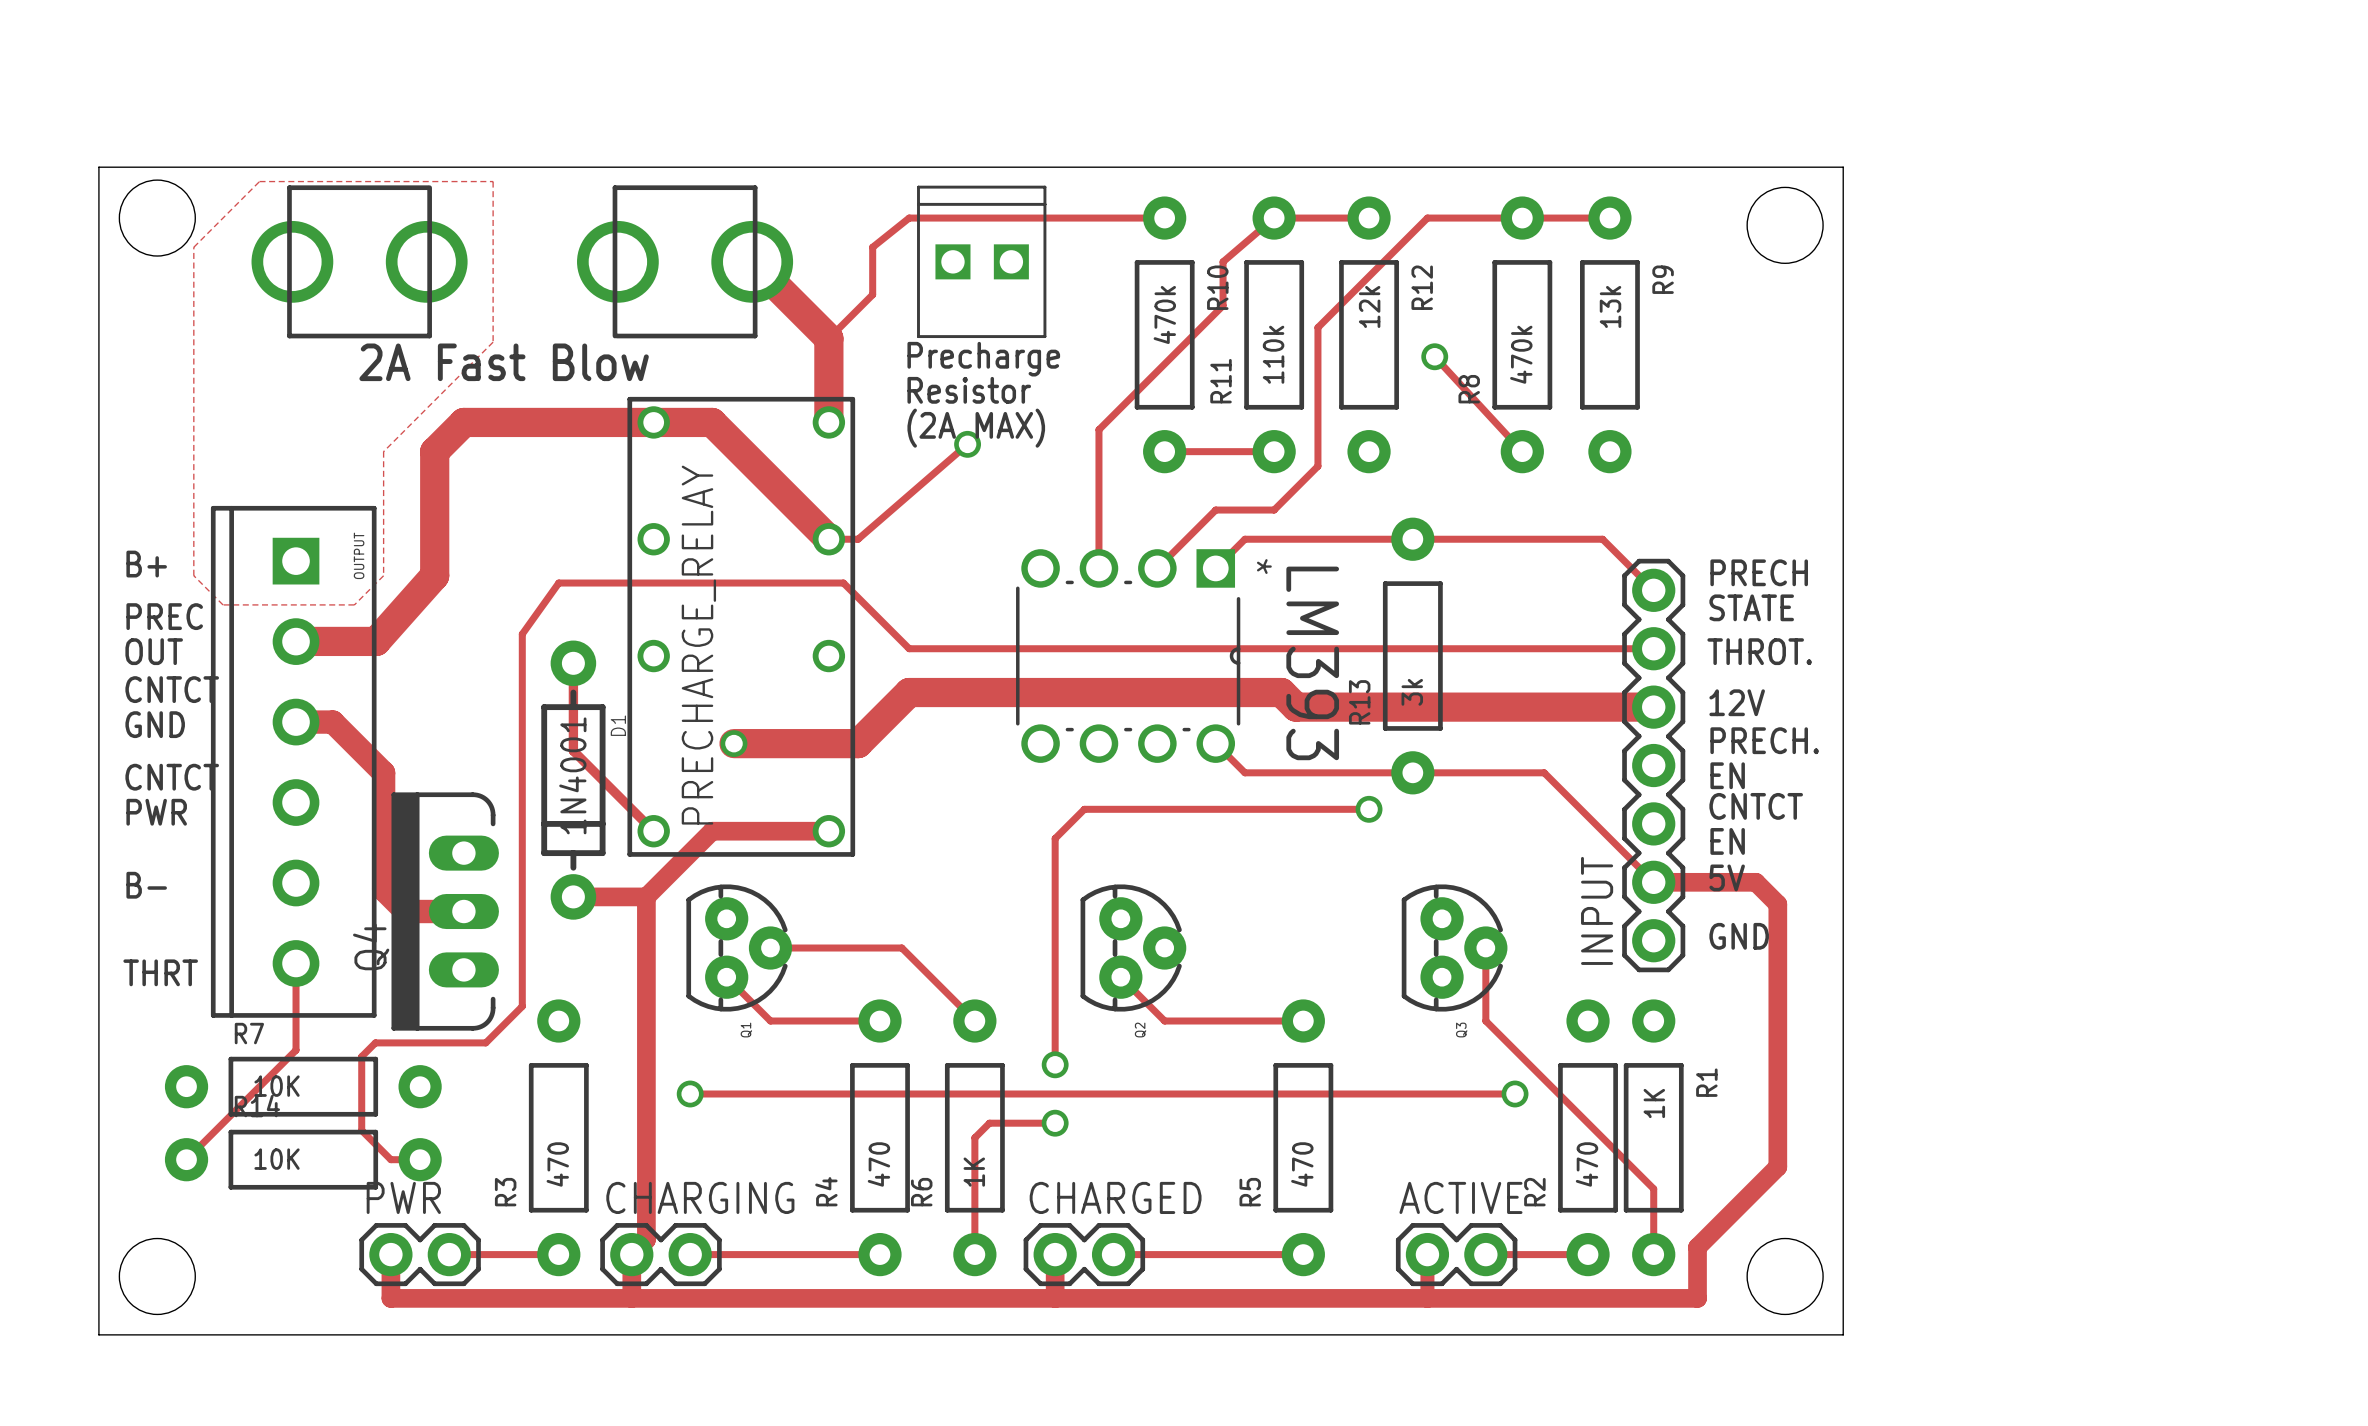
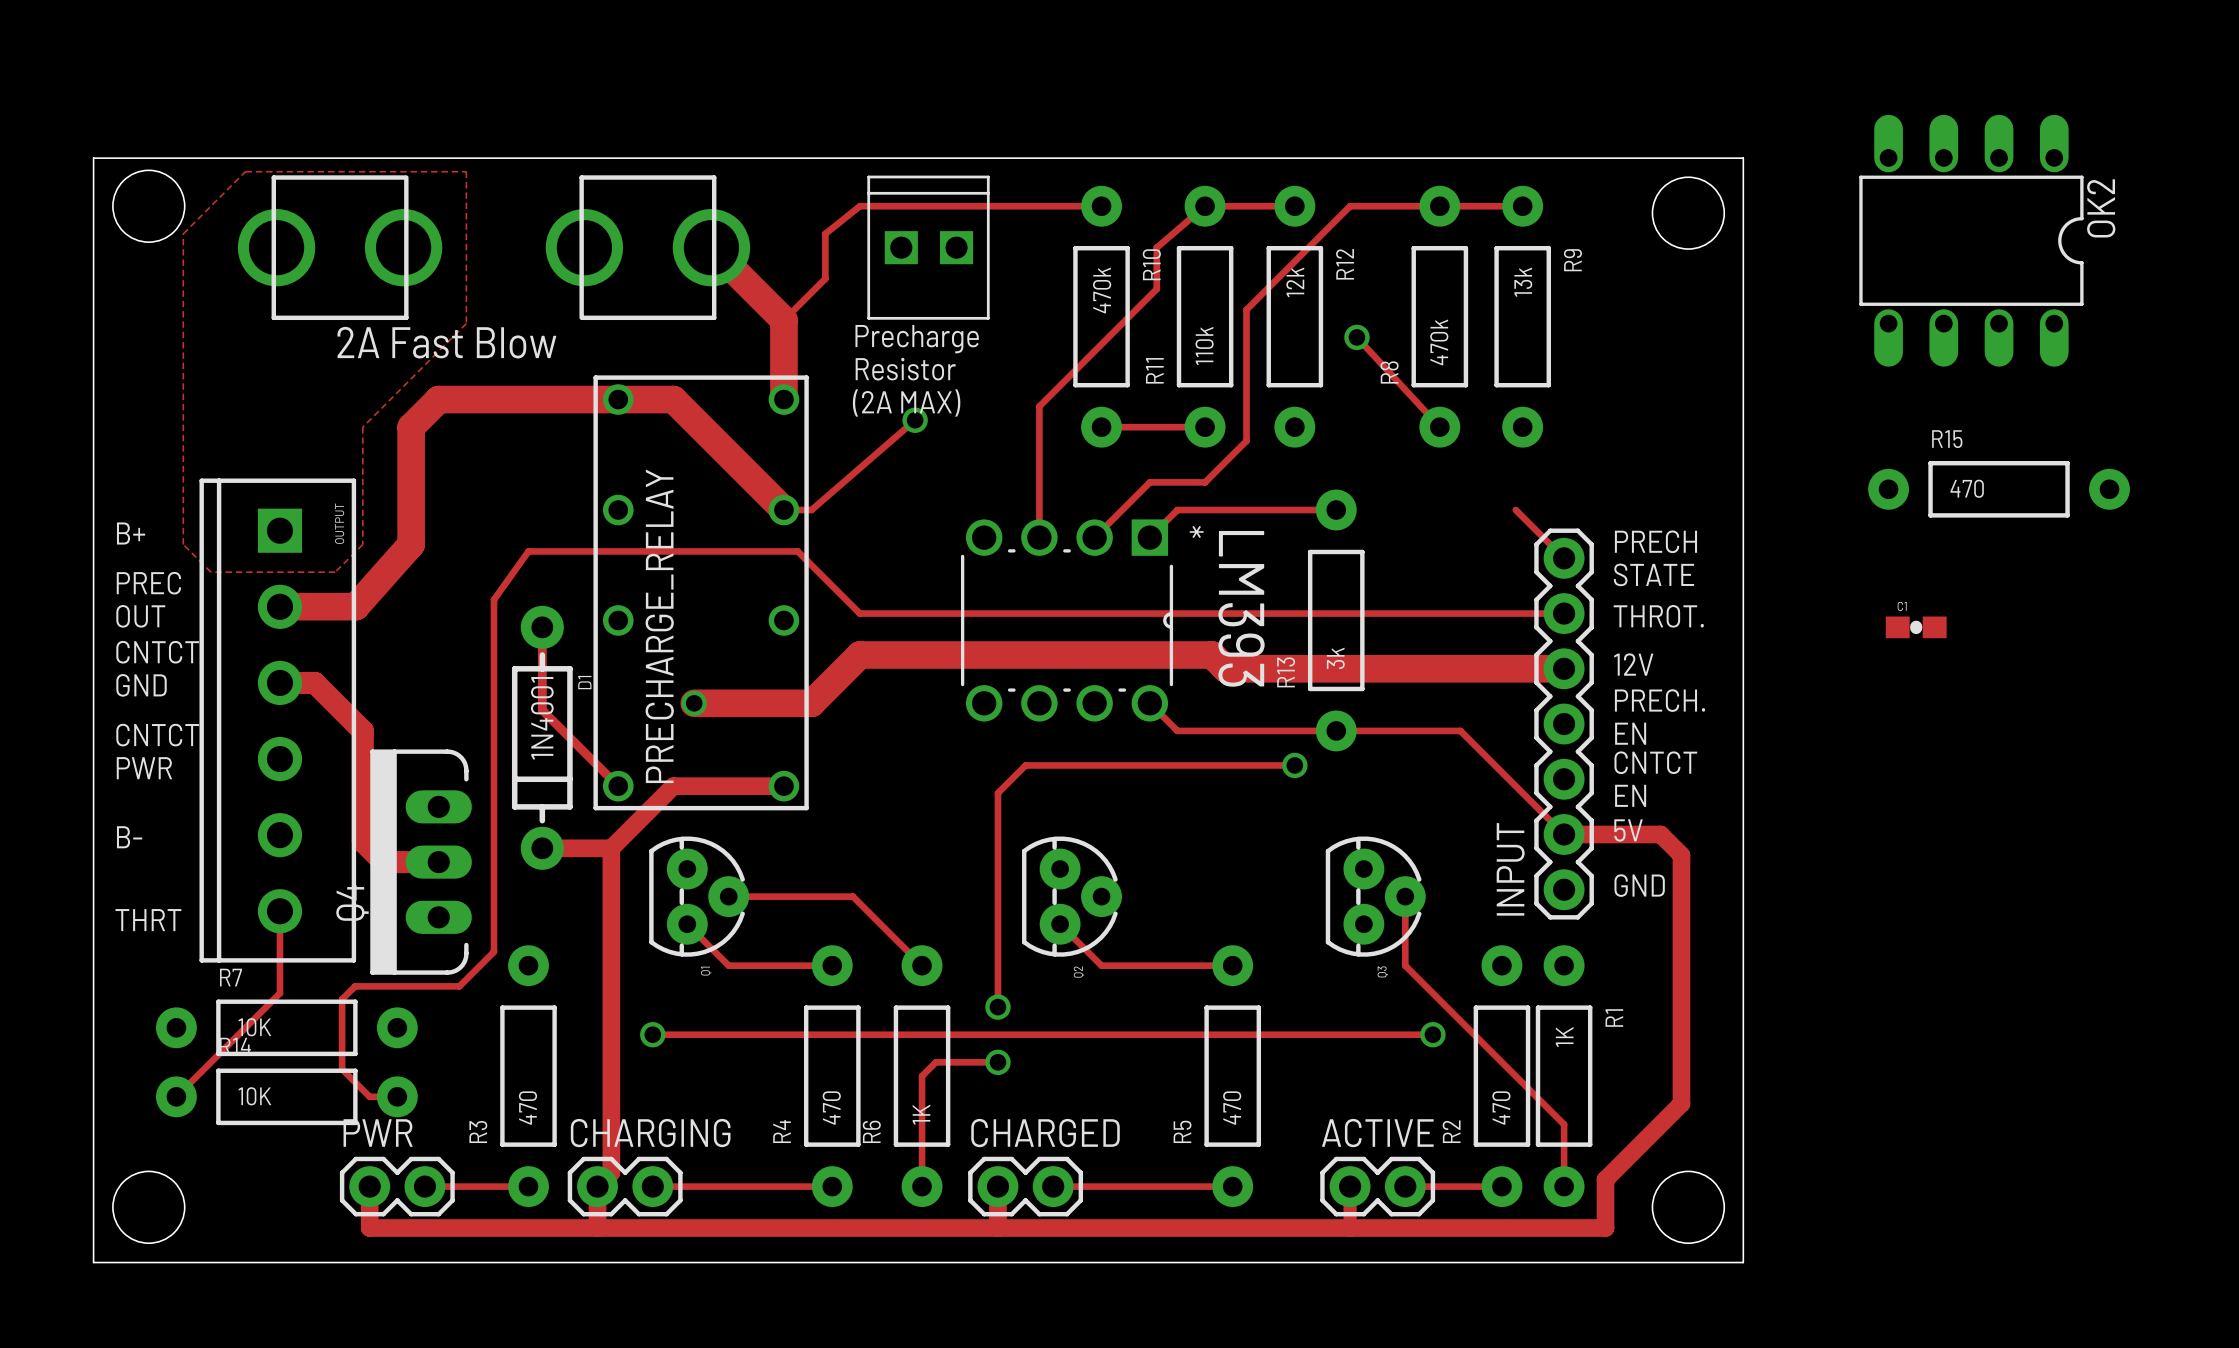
OK2: none -> (1971, 240)
R15: none -> 470 (1999, 489)
track: (1412, 539) (1602, 539) -> none
C1: none -> (1916, 627)

